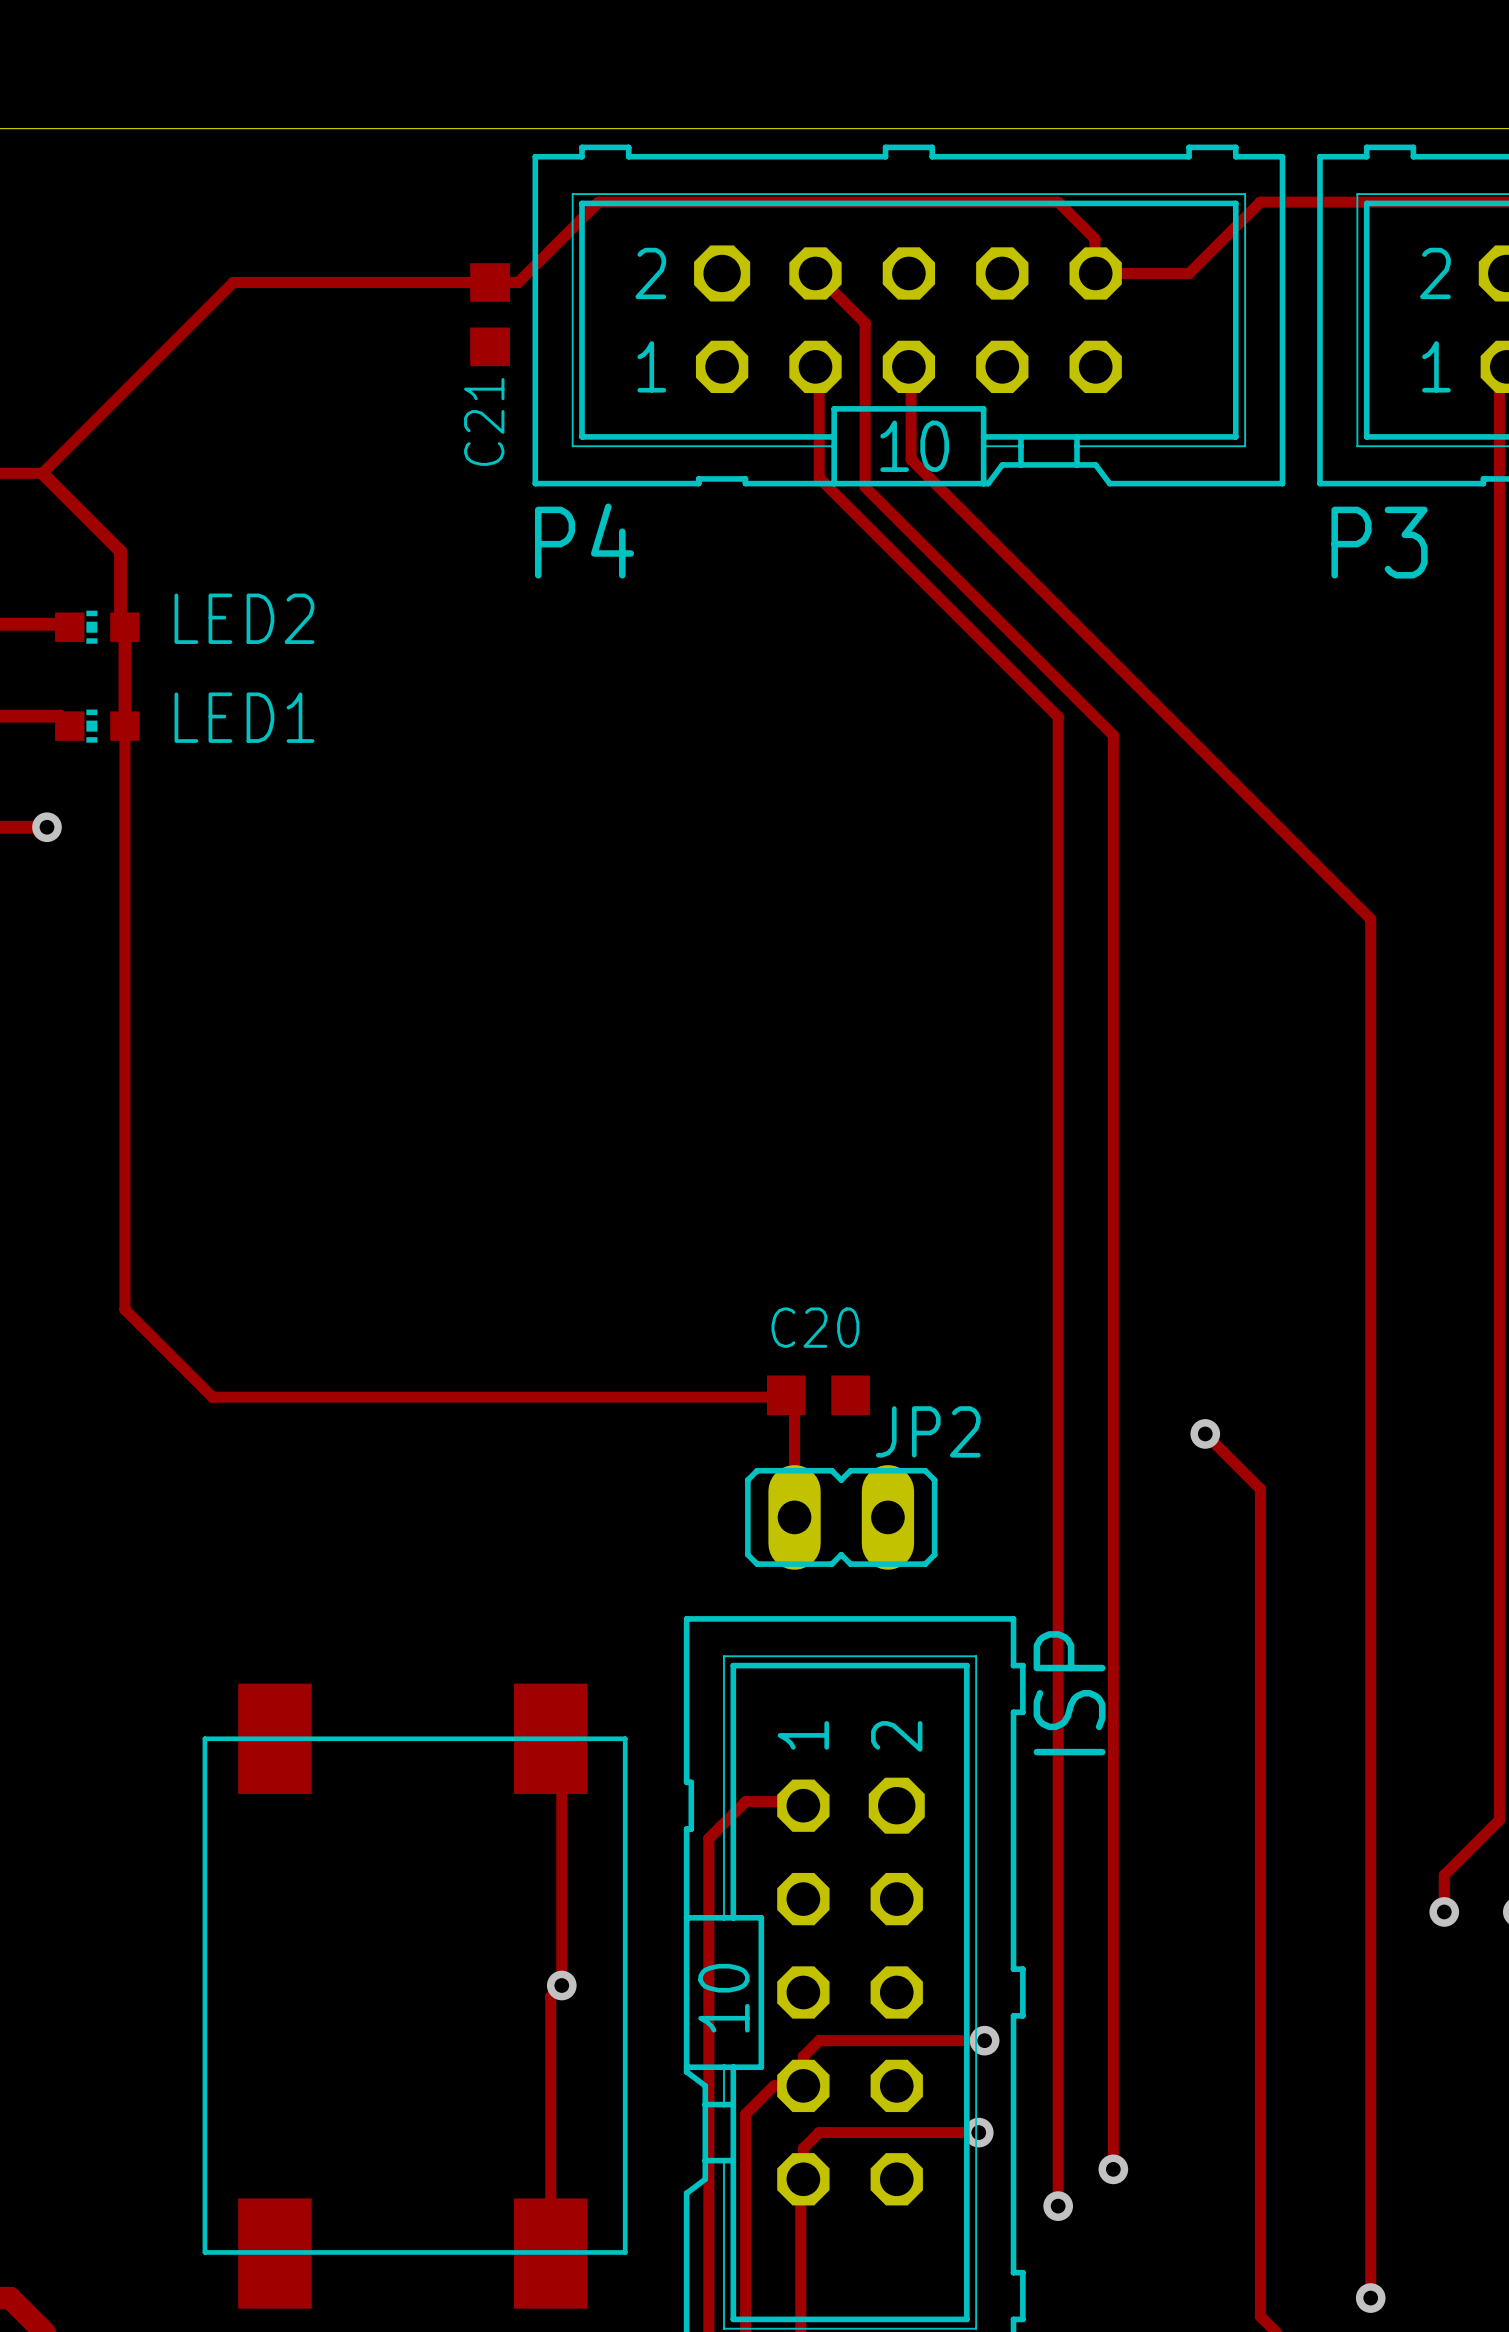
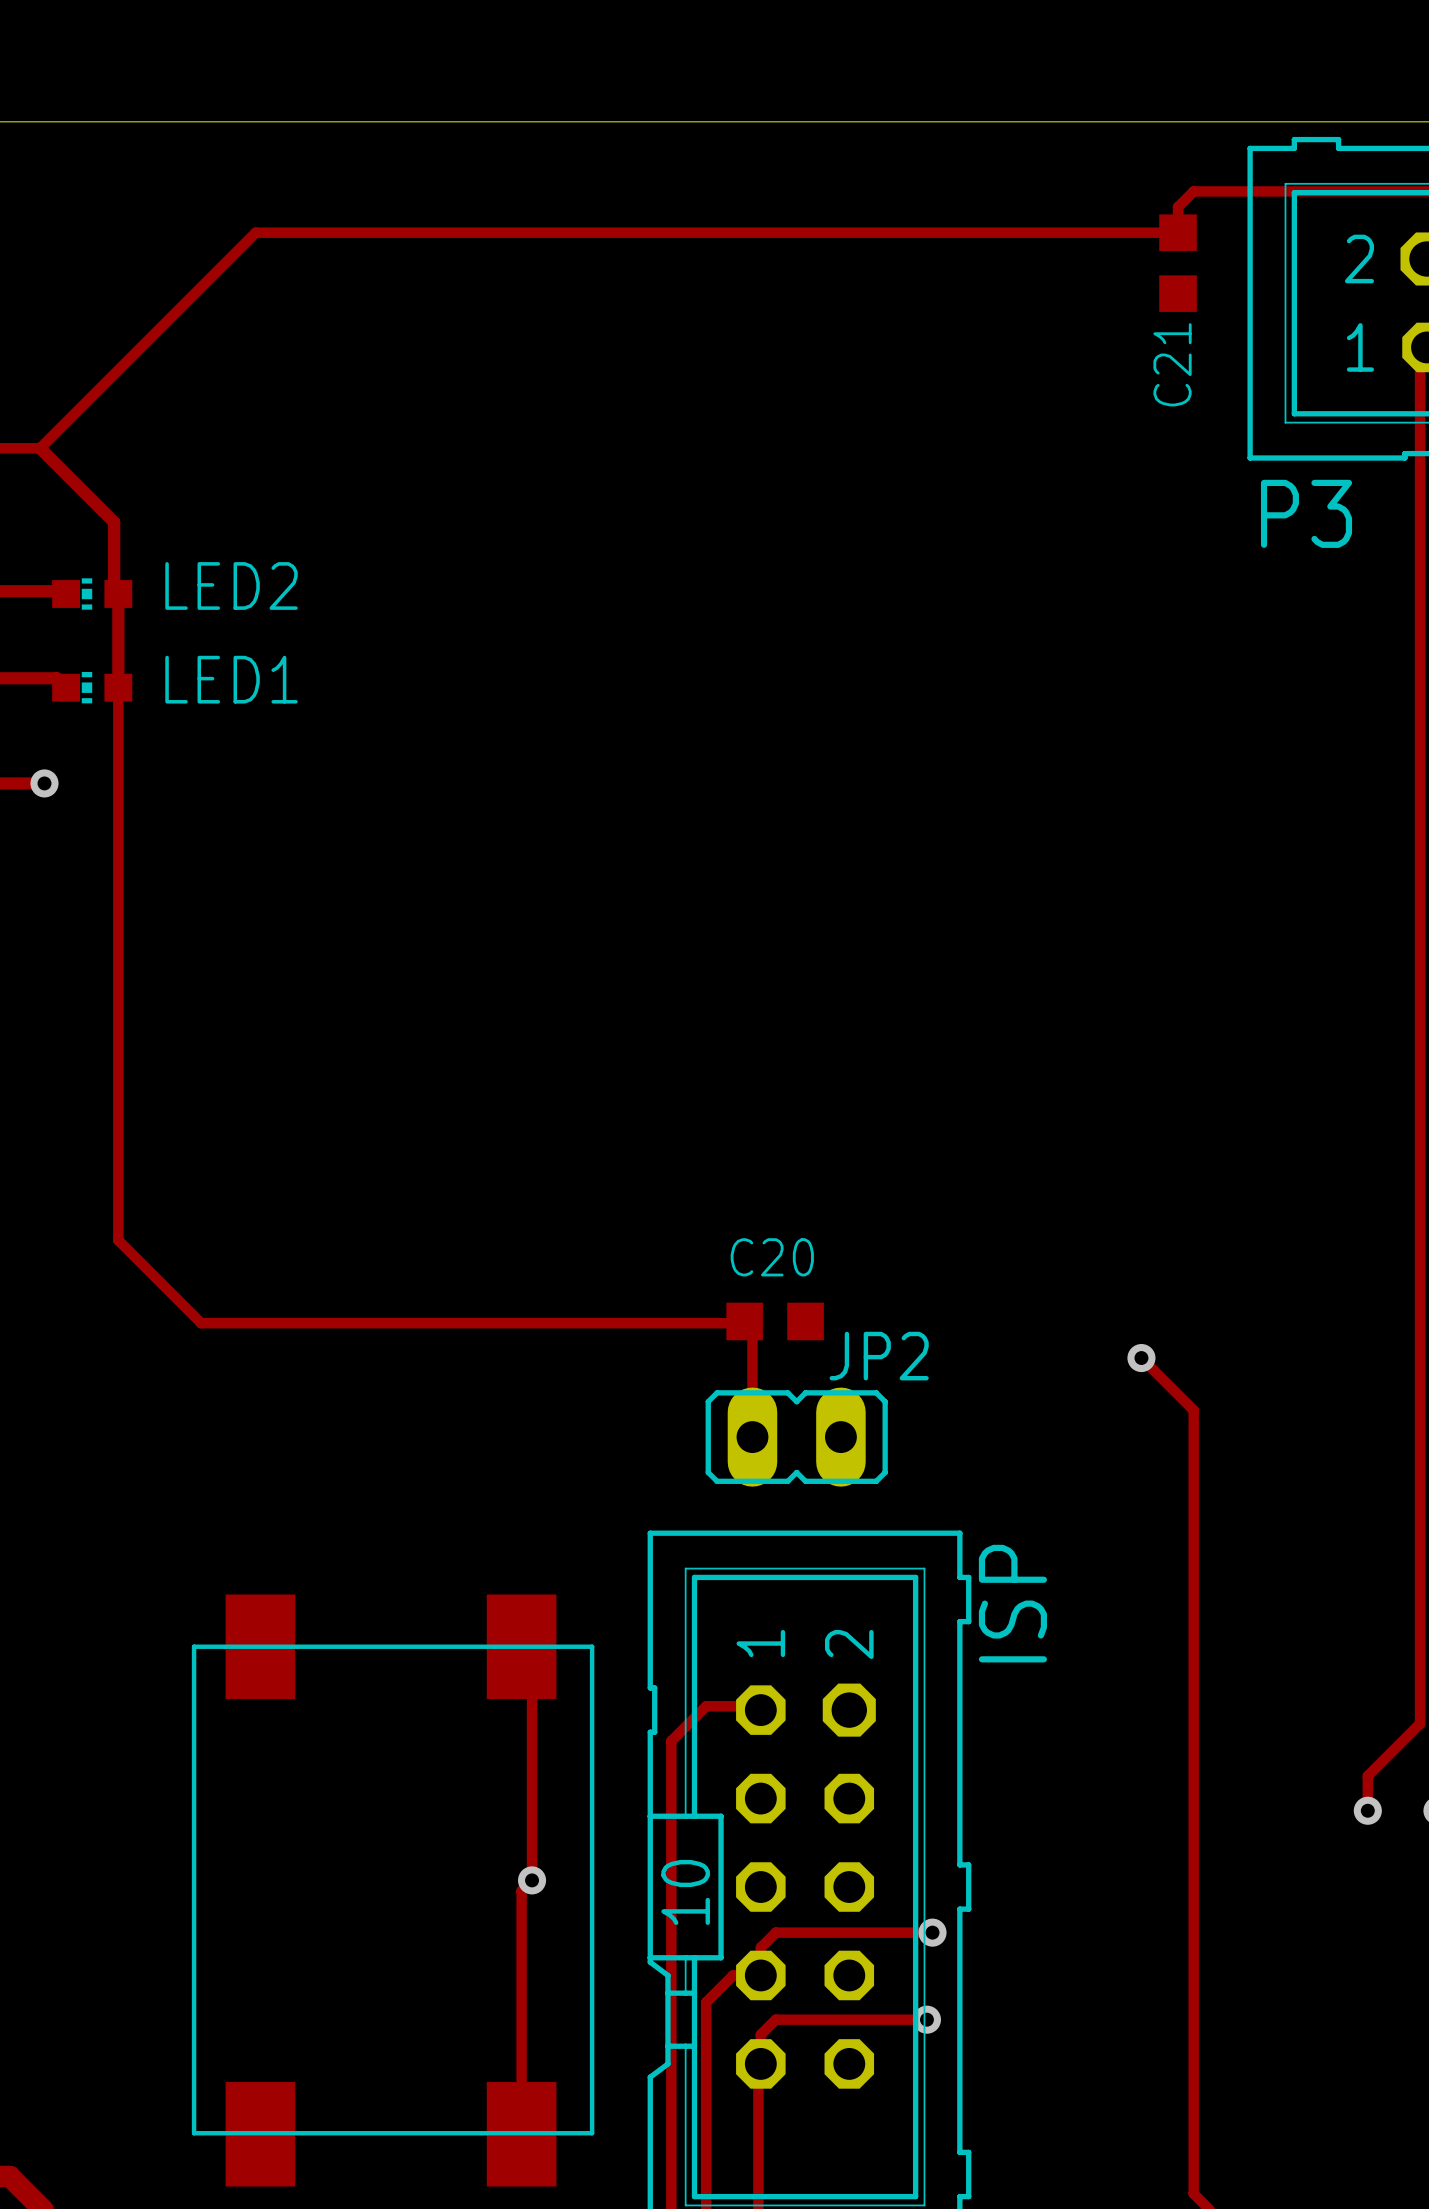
track: (1243, 218) (1189, 273) (1095, 273) (1094, 238) (1058, 202) (598, 202) (518, 282) (233, 282) -> (1178, 207) (1178, 232) (255, 232) (220, 267)
track: (815, 273) (865, 323) (865, 487) (1113, 735) (1113, 2169) -> none
C21 position: (490, 314) -> (1178, 263)
P4: (908, 315) -> none
track: (815, 366) (819, 370) (819, 477) (1058, 716) (1058, 2206) -> none
track: (908, 366) (911, 369) (911, 459) (1370, 919) (1370, 2298) -> none
via: (1113, 2169) -> none
via: (1058, 2206) -> none
via: (1370, 2298) -> none

